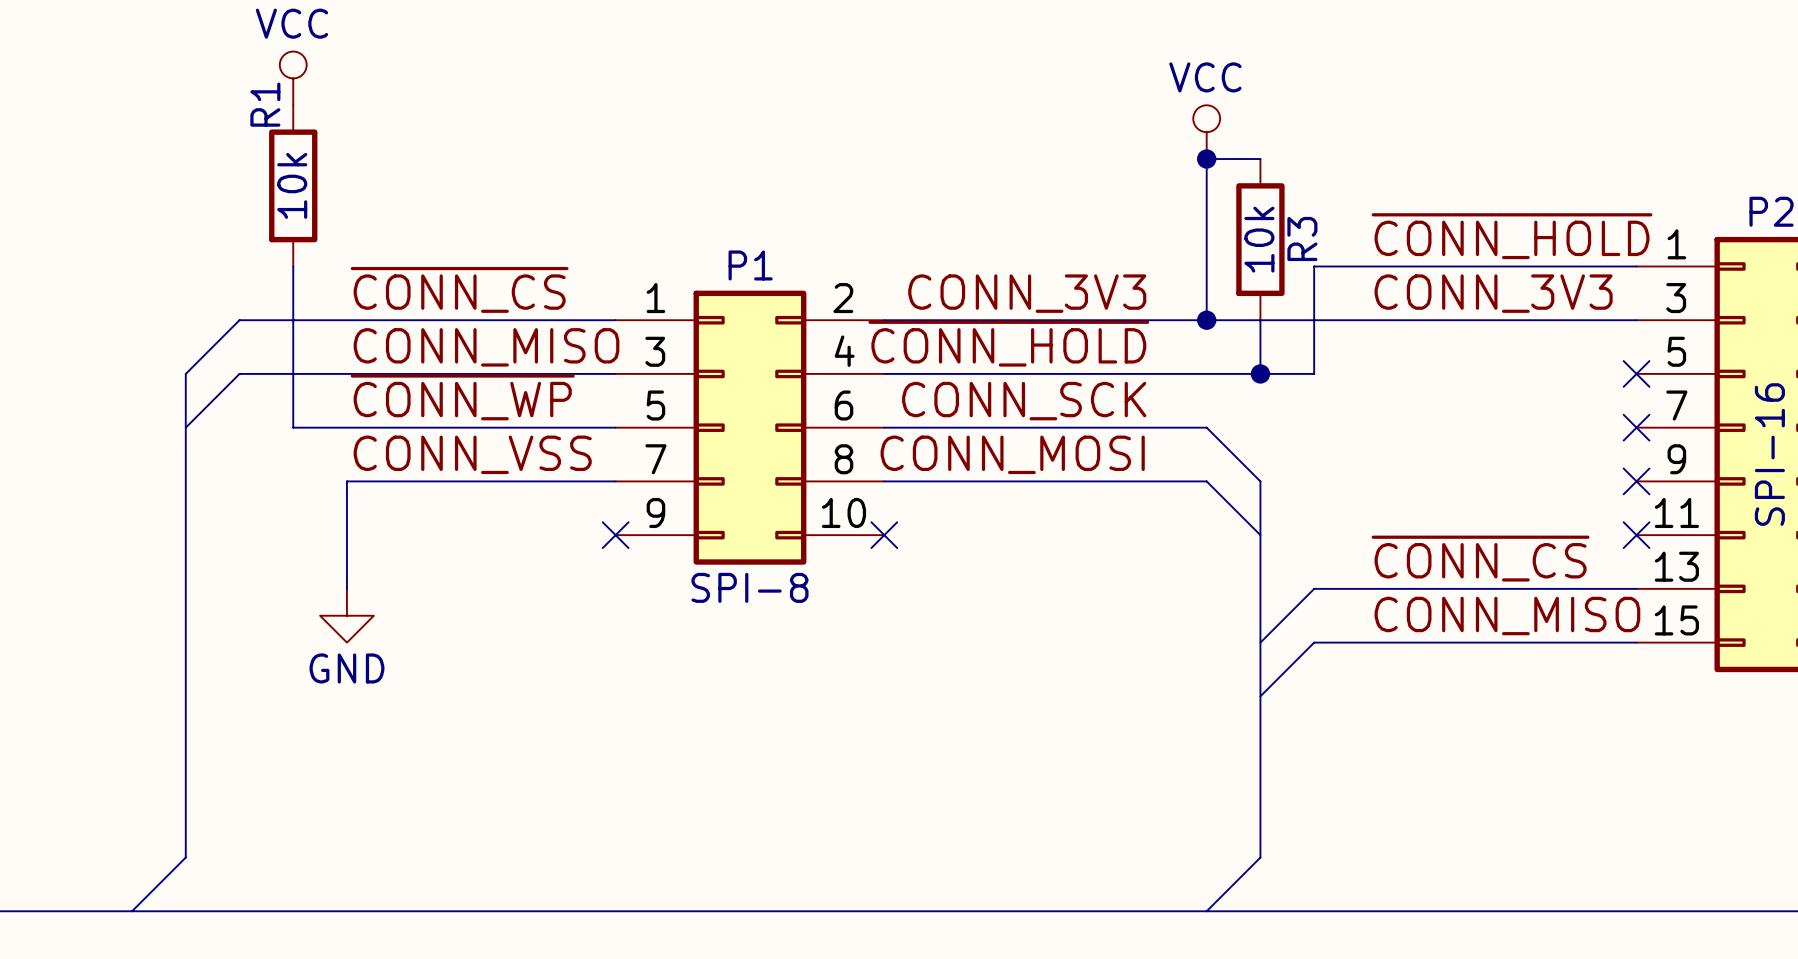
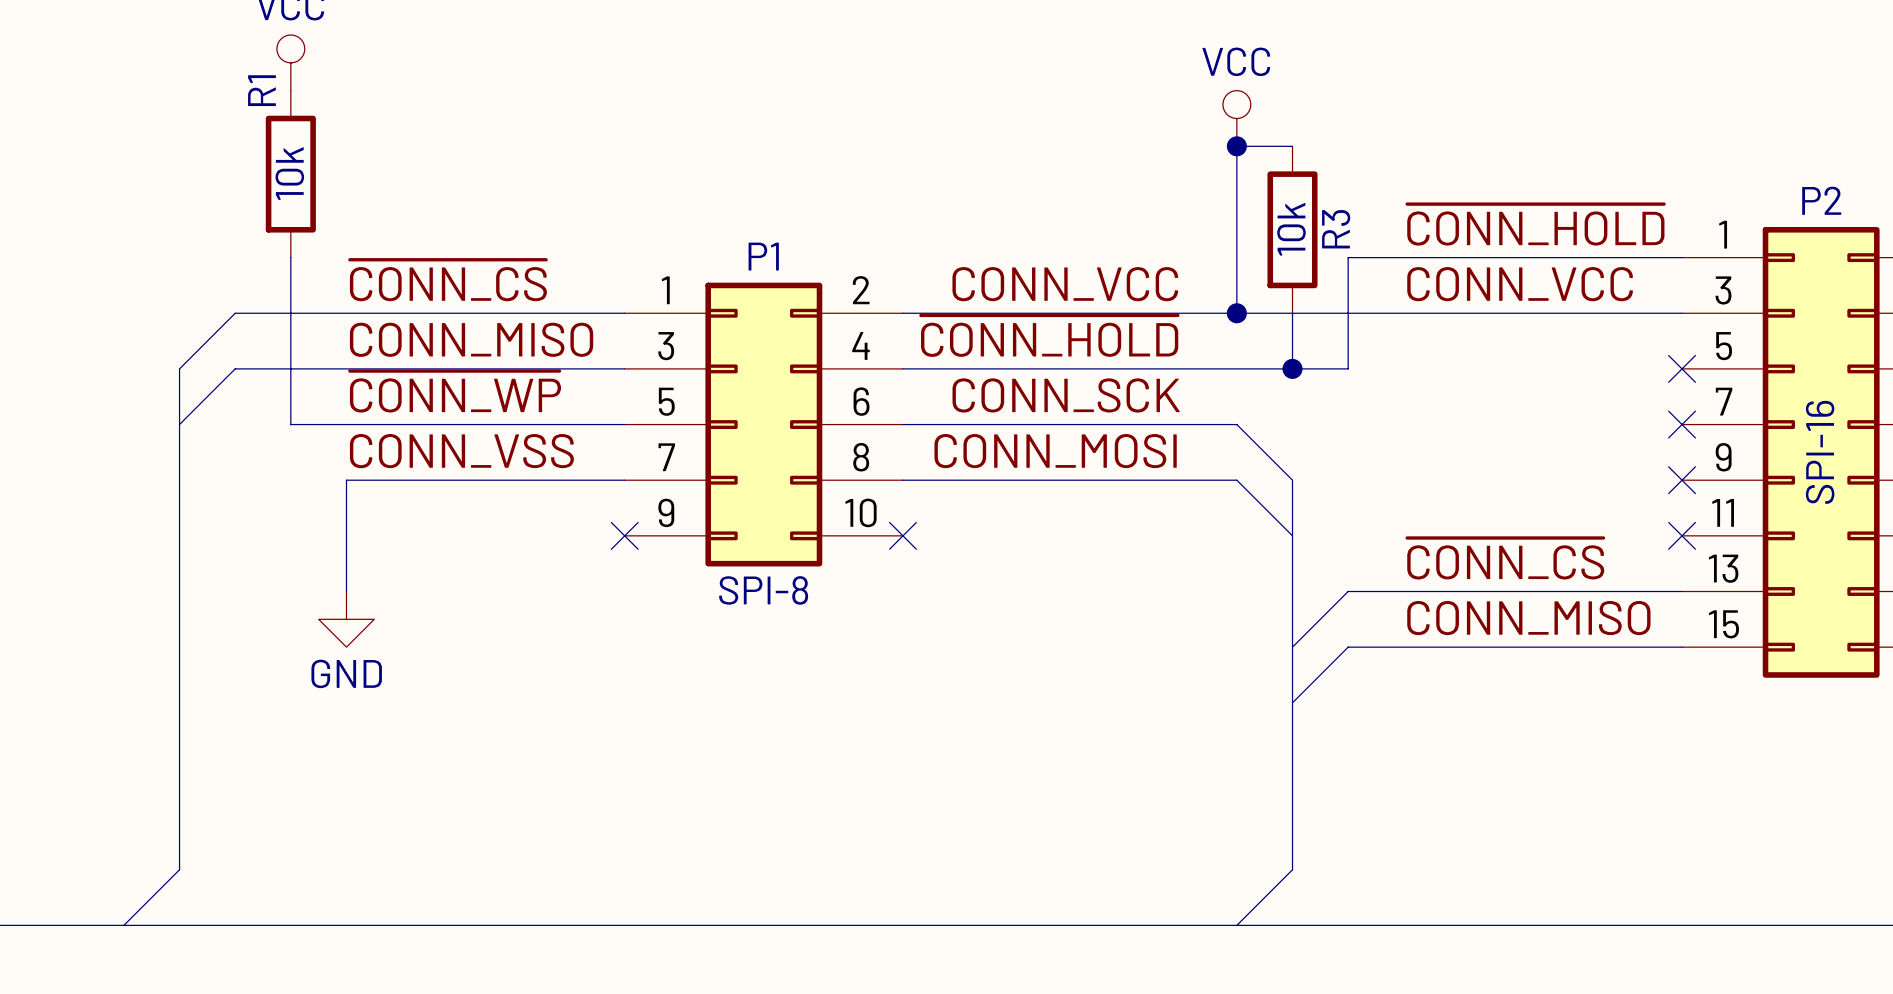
label: CONN_3V3 (1027, 293) -> CONN_VCC (1065, 284)
label: CONN_3V3 (1493, 293) -> CONN_VCC (1520, 284)

